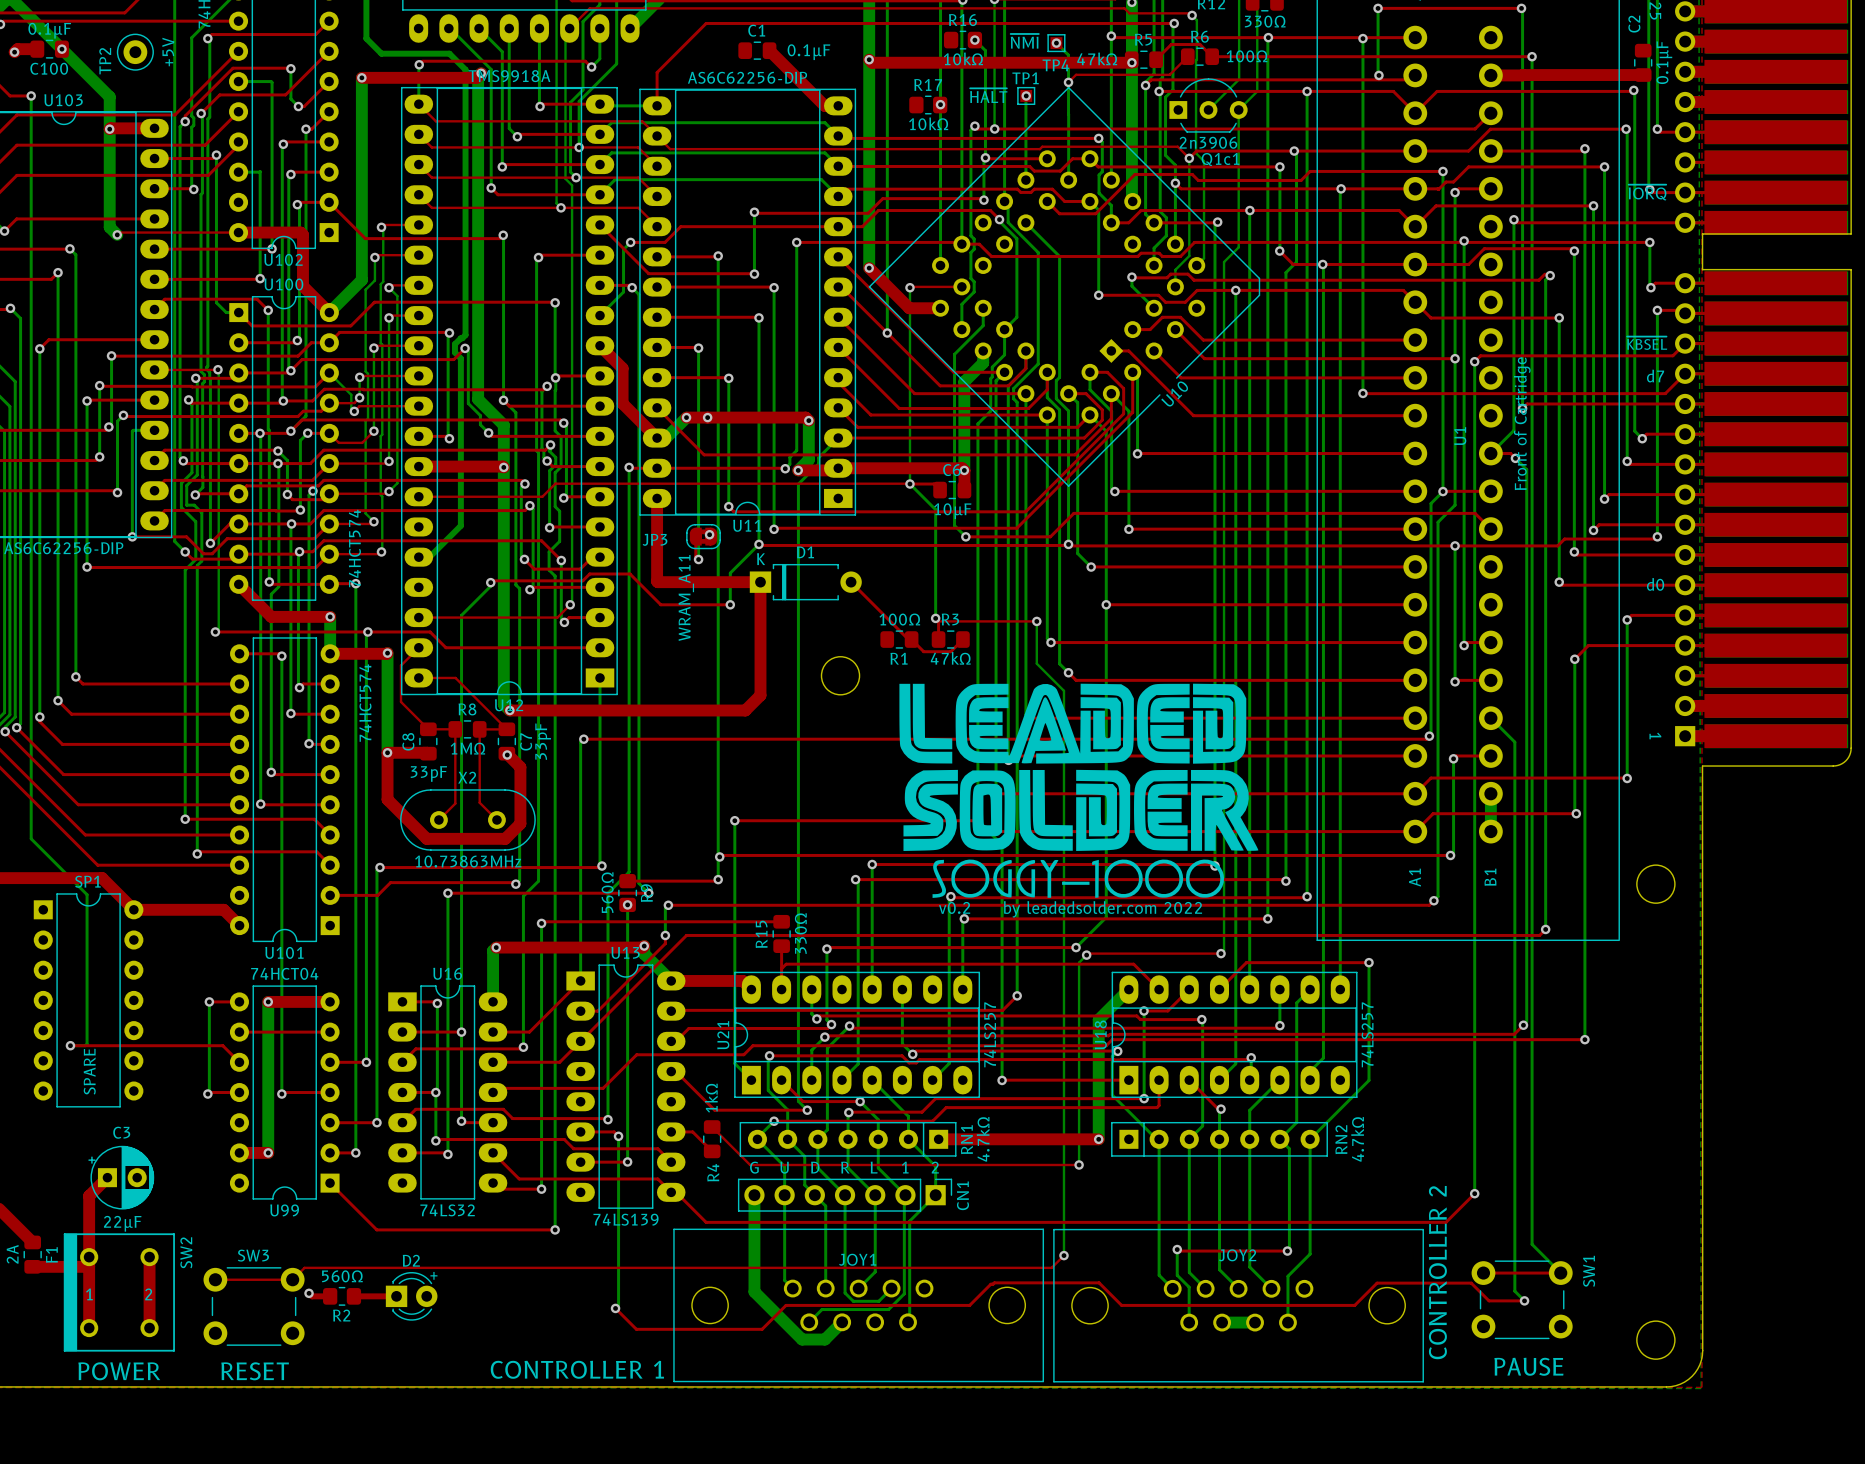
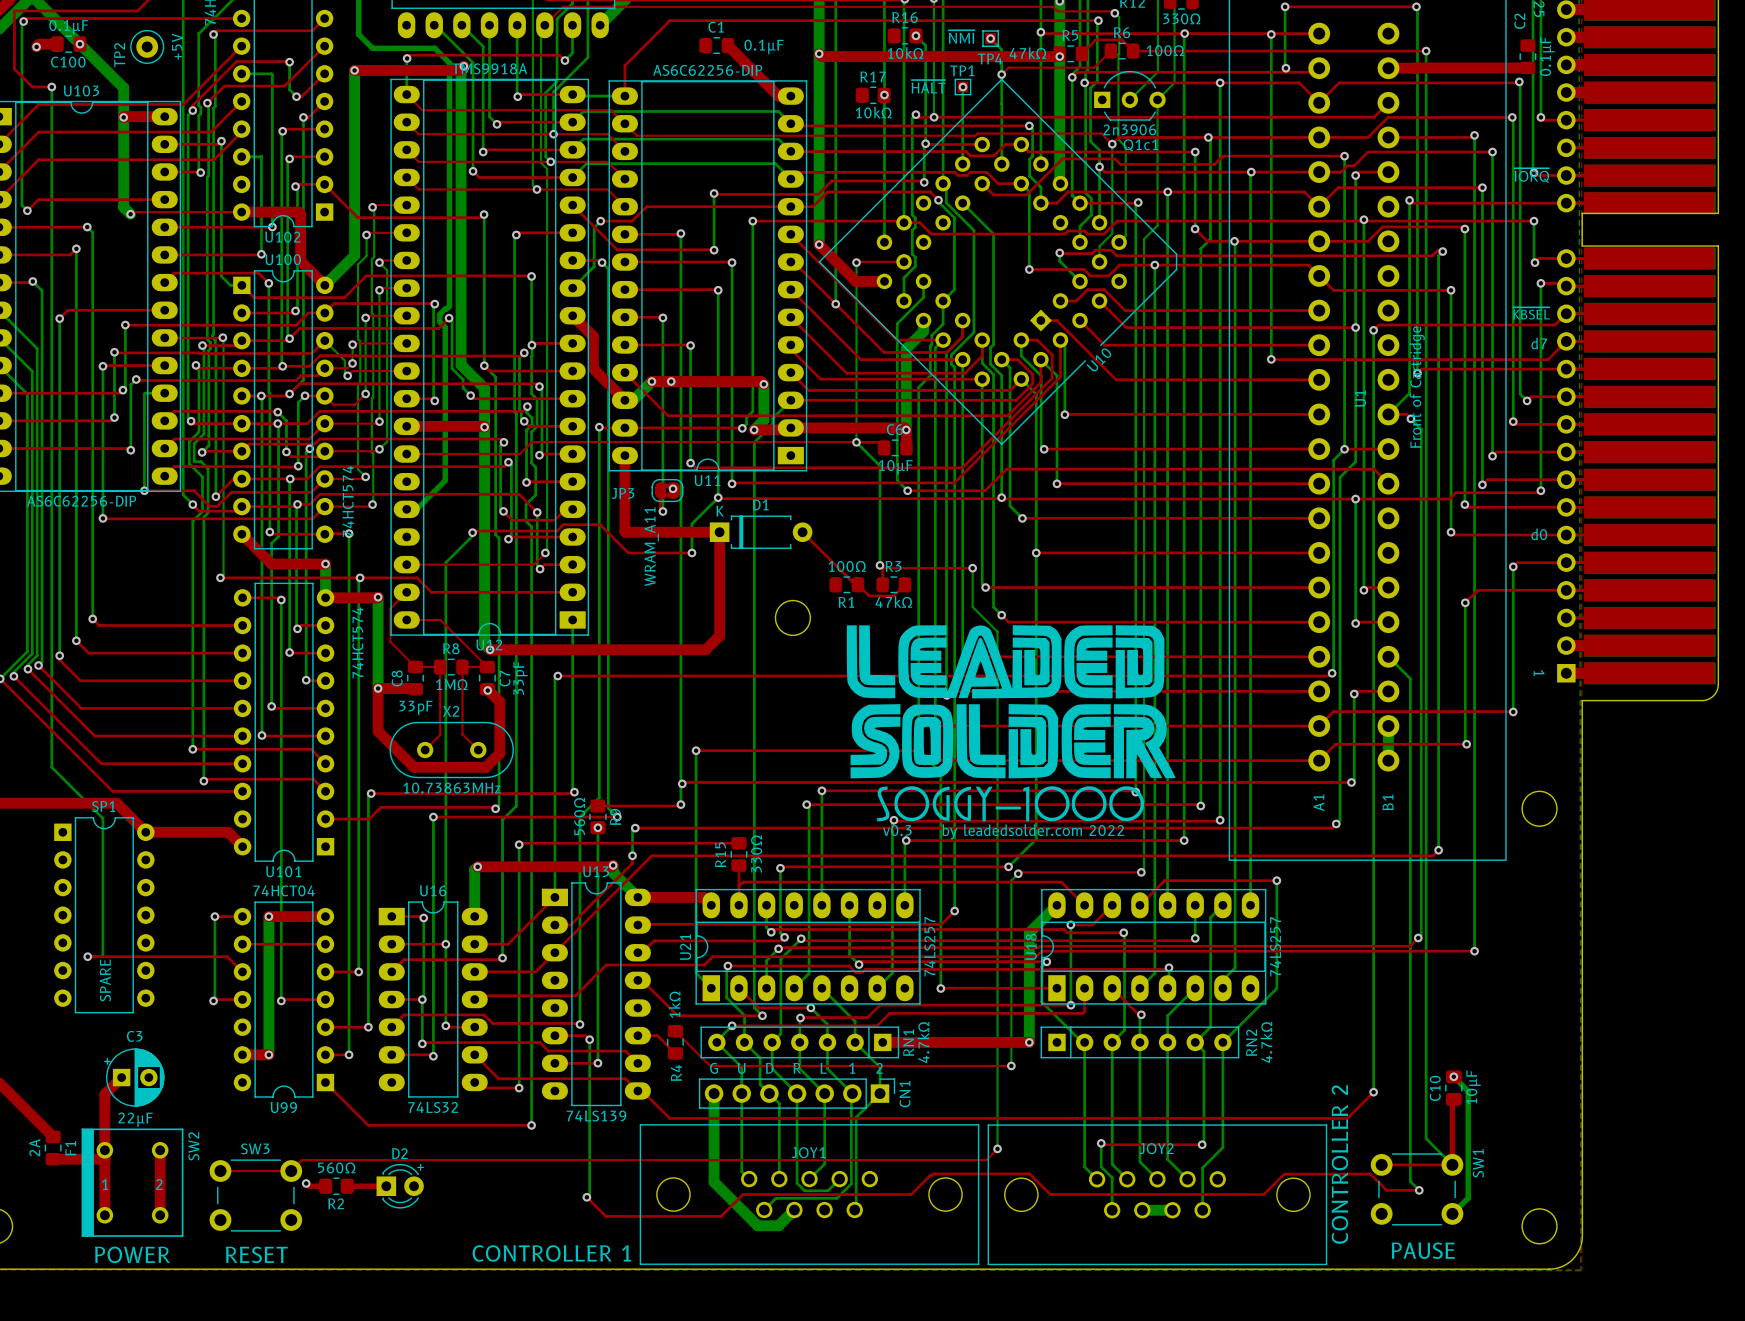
text: v0.2 (954, 907) -> v0.3 (897, 830)
bottom track: none -> (1453, 1076) (1468, 1091) (1468, 1198) (1452, 1213)
via: none -> (1453, 1076)
C10: none -> 10µF (1453, 1088)
top track: none -> (1453, 1099) (1452, 1164)

